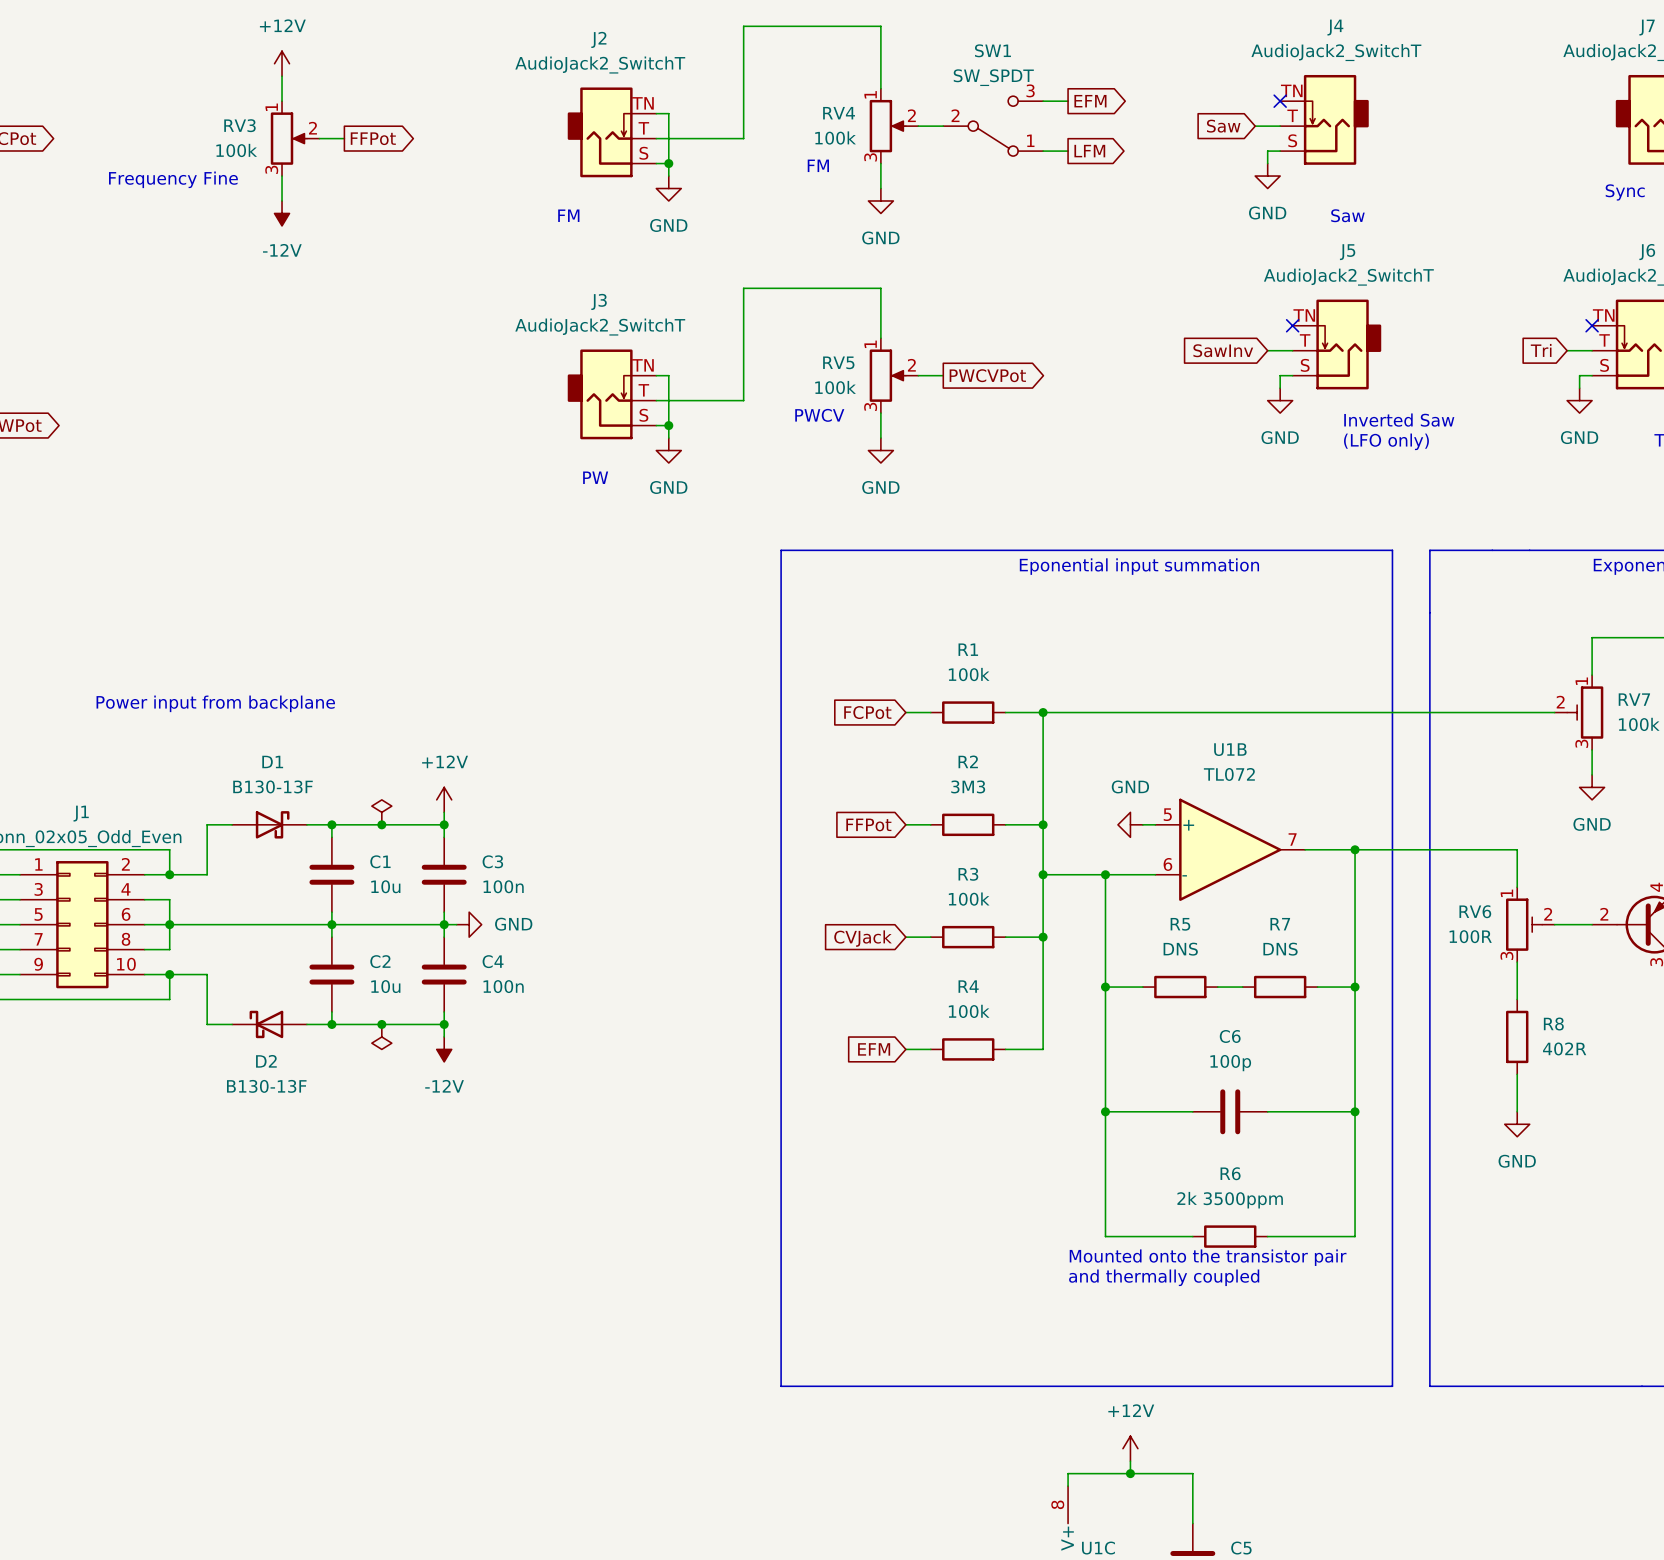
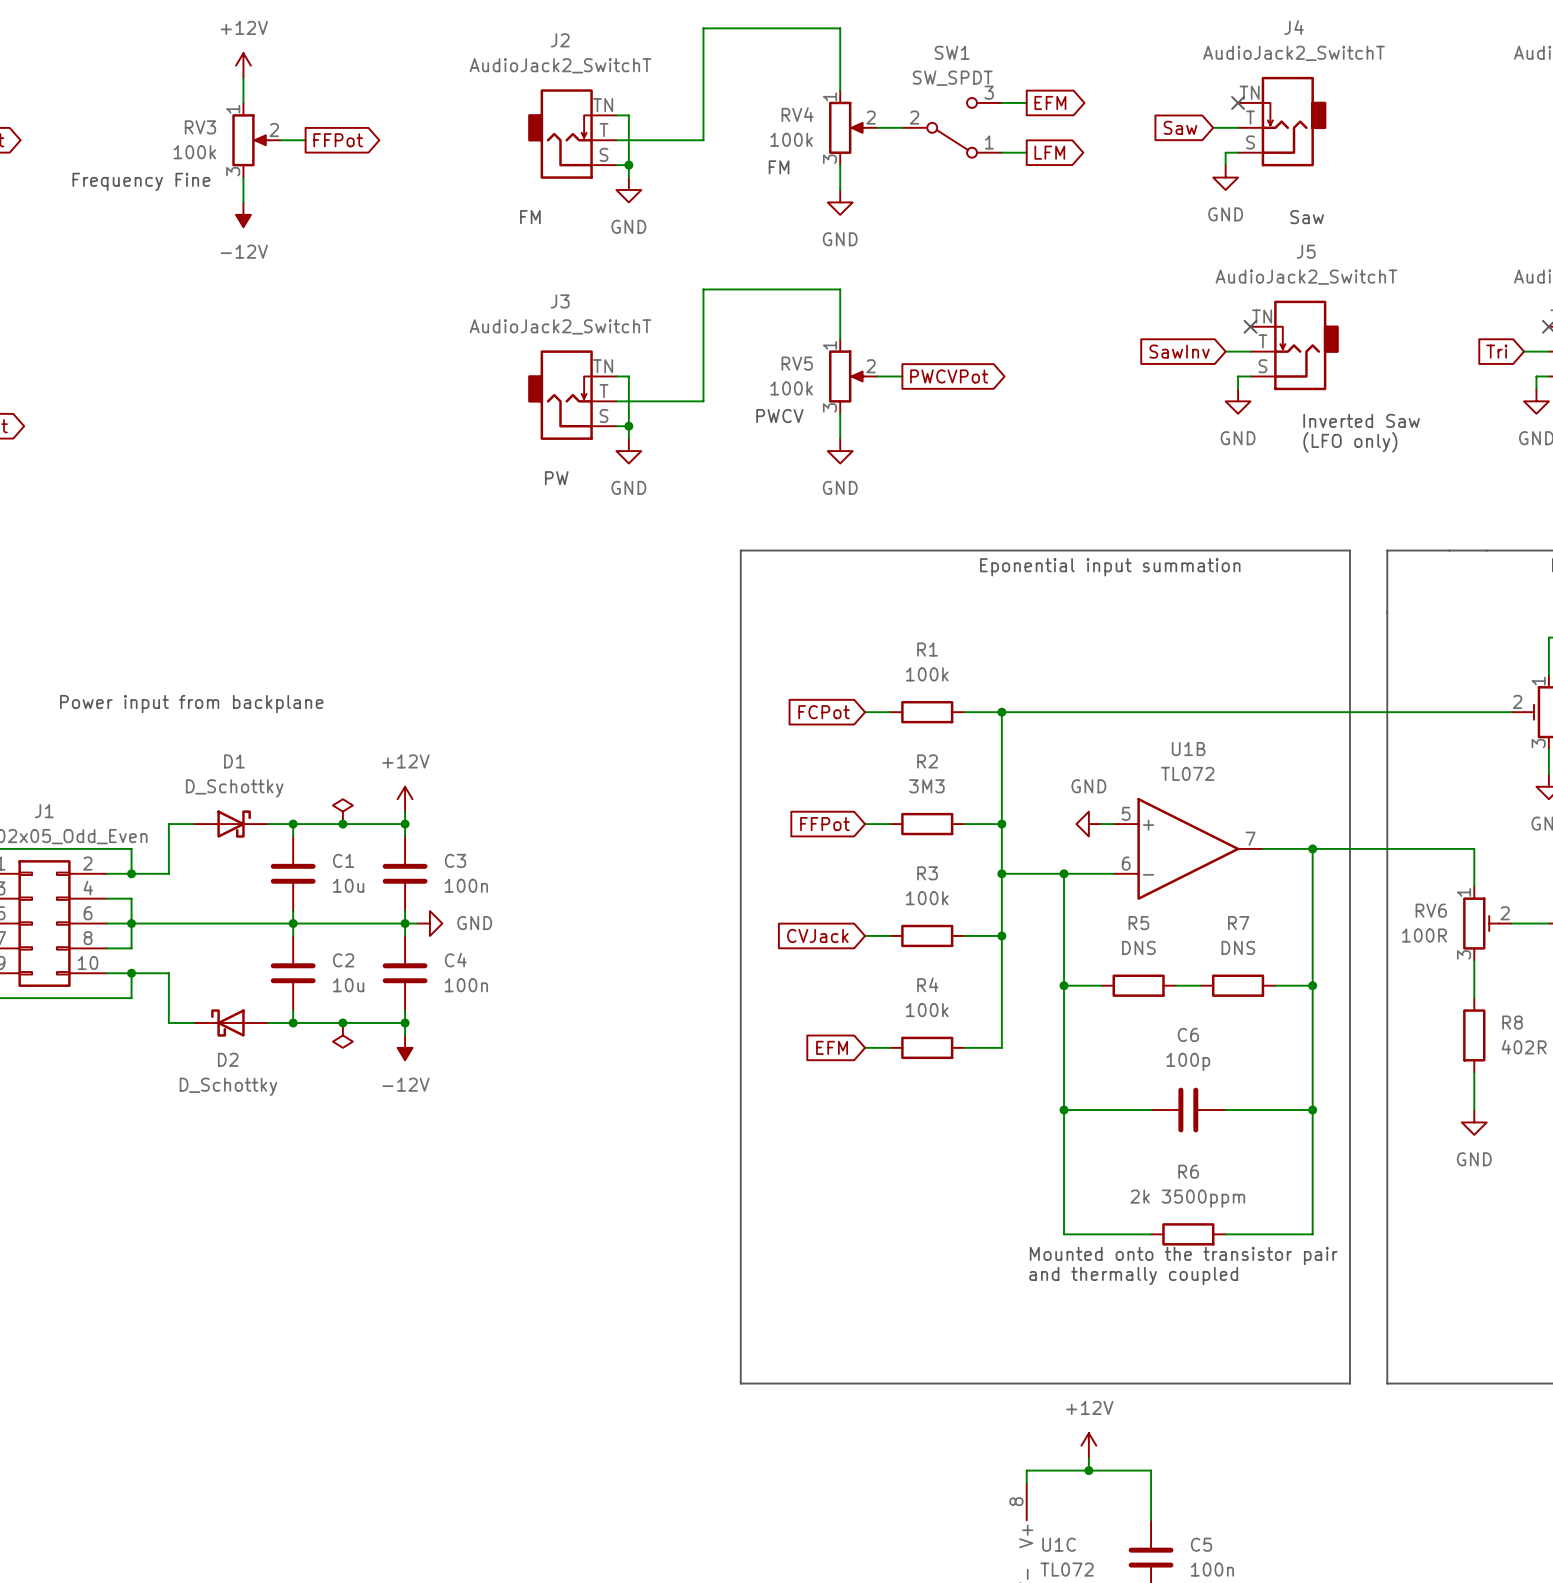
D1 value: B130-13F (272, 786) -> D_Schottky (234, 788)
D2 value: B130-13F (266, 1086) -> D_Schottky (228, 1086)

